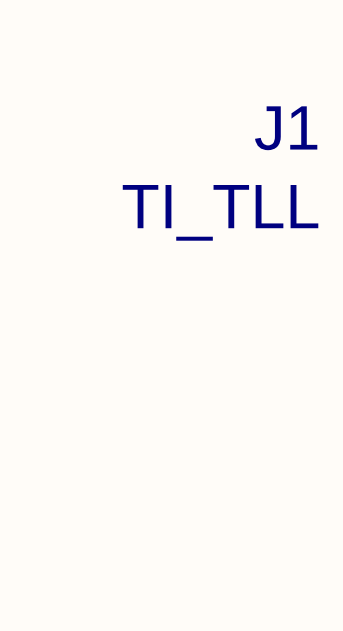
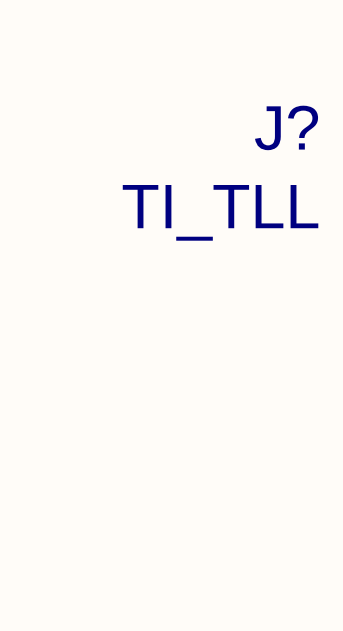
J1 name: J1 (286, 128) -> J? (286, 127)

